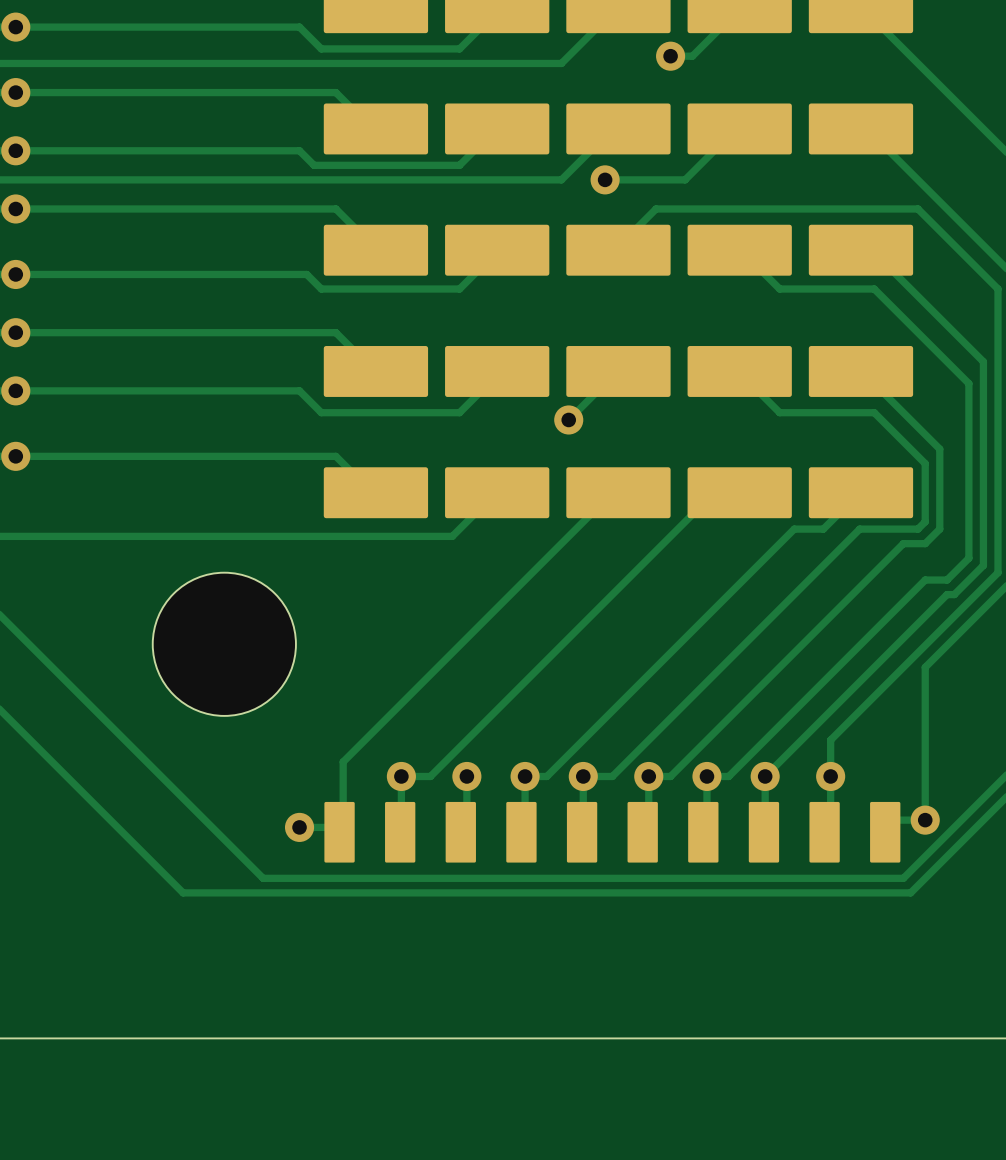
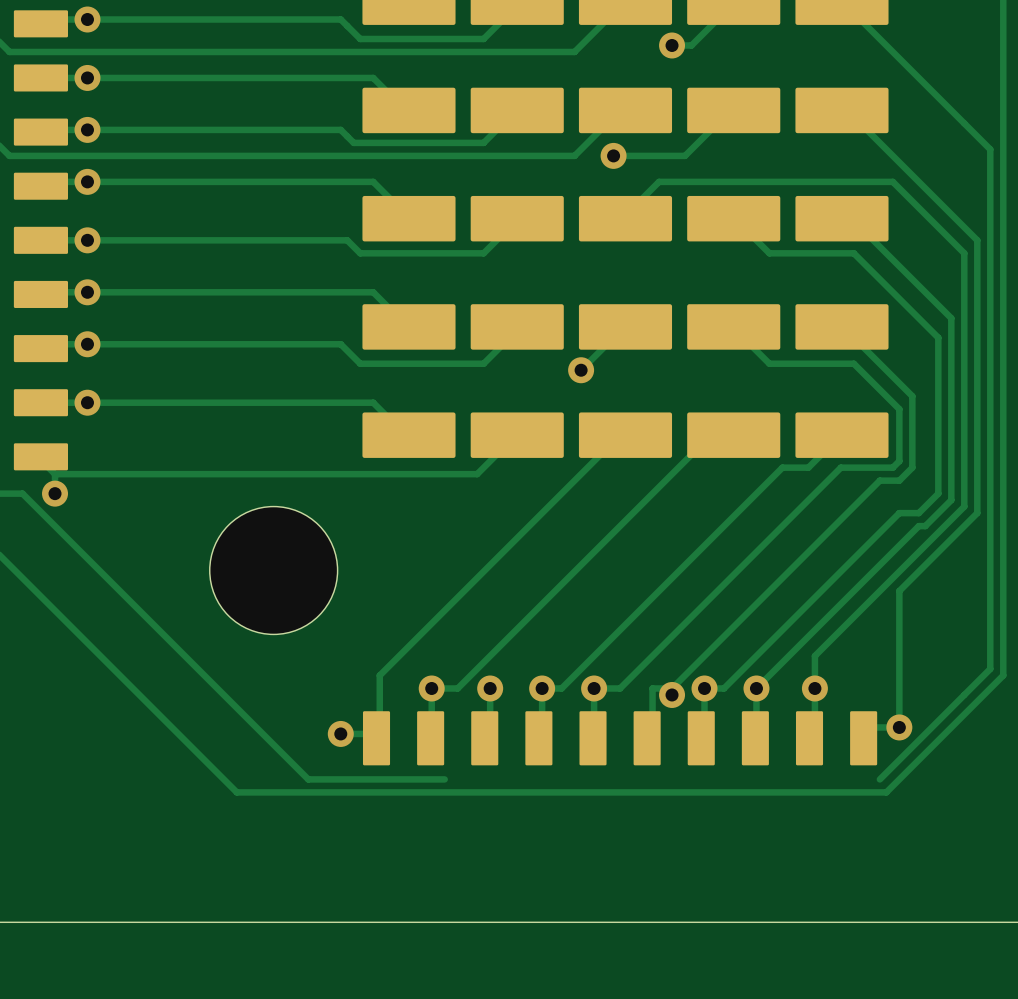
via position: (648, 776) -> (672, 694)
track: (415, 878) (903, 878) -> none

